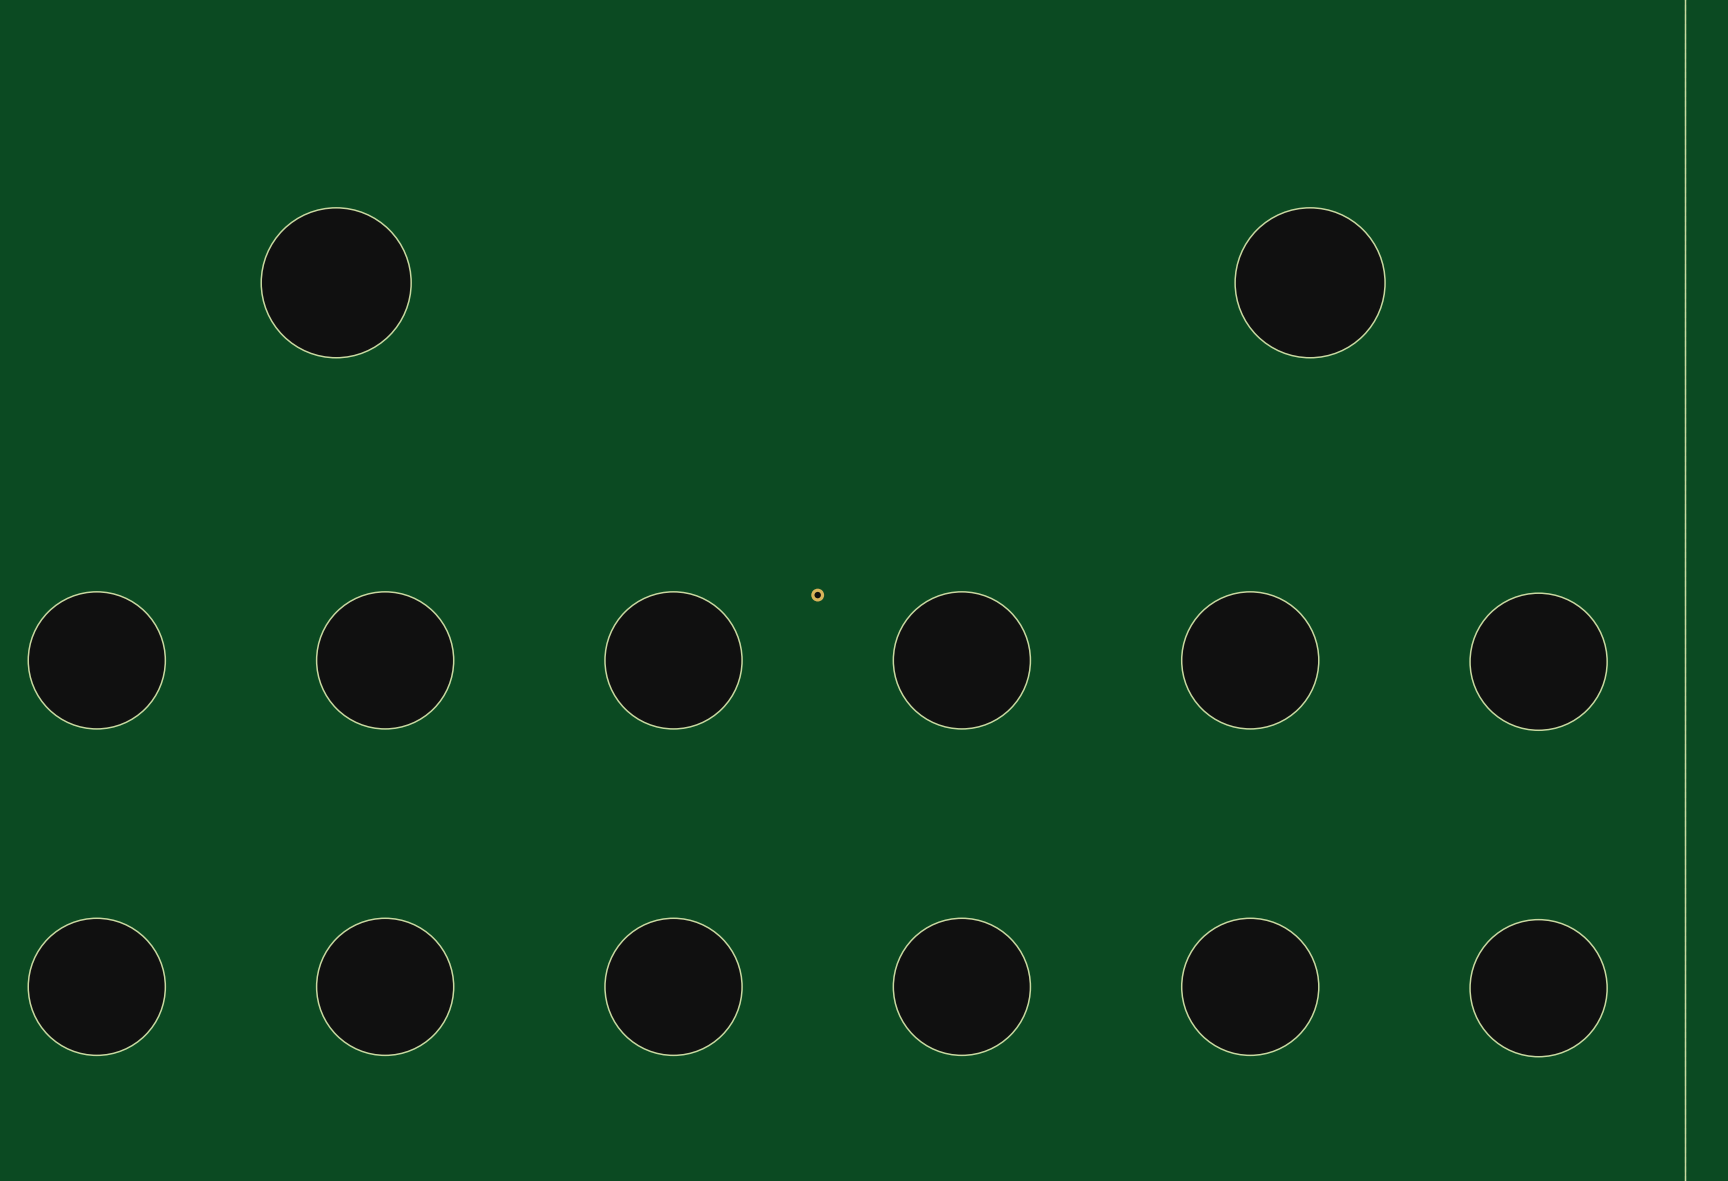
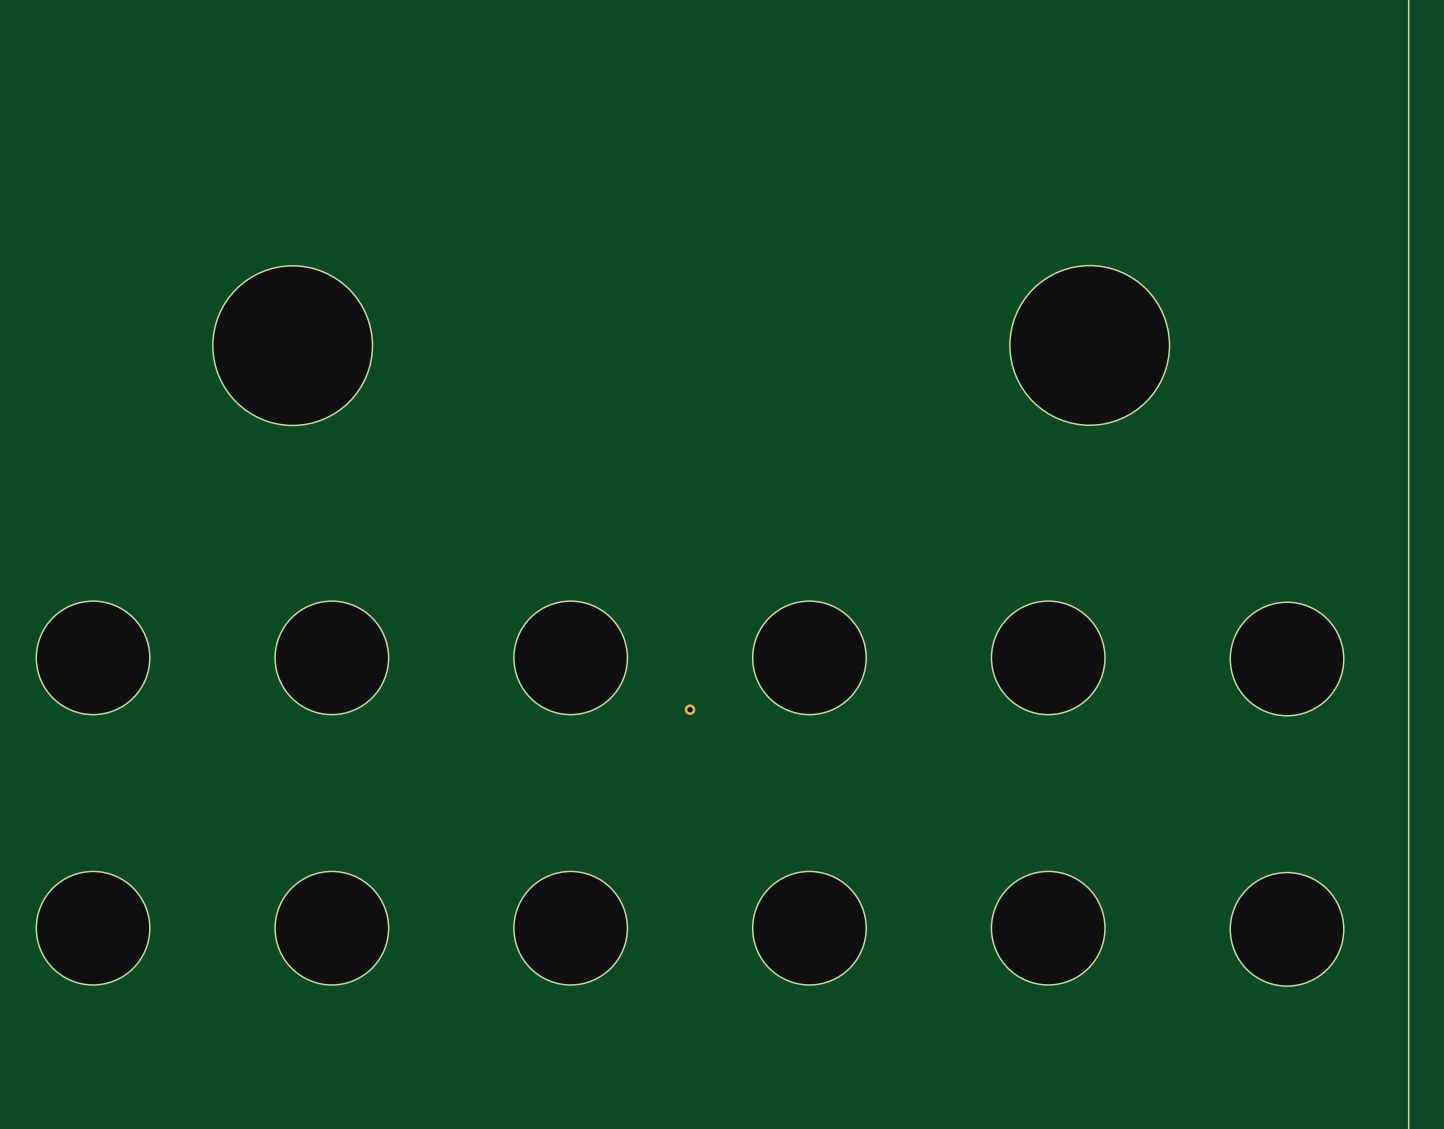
part footprint: [261, 207, 412, 358] -> [212, 265, 373, 426]
part footprint: [1235, 207, 1386, 358] -> [1009, 265, 1170, 426]
part position: (817, 595) -> (690, 709)

